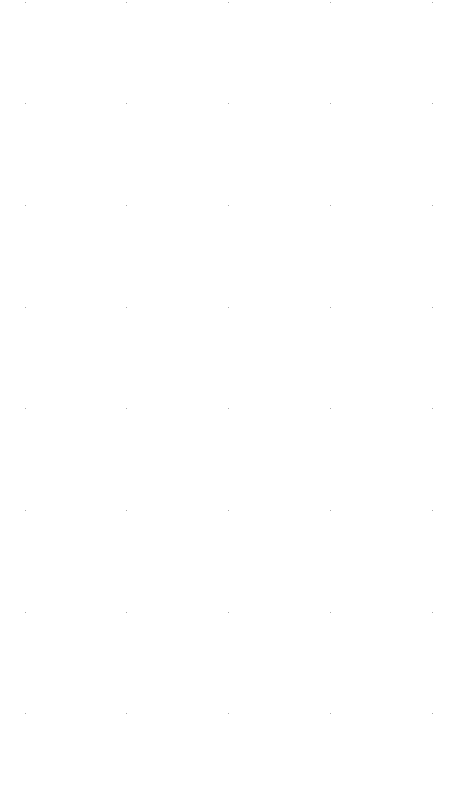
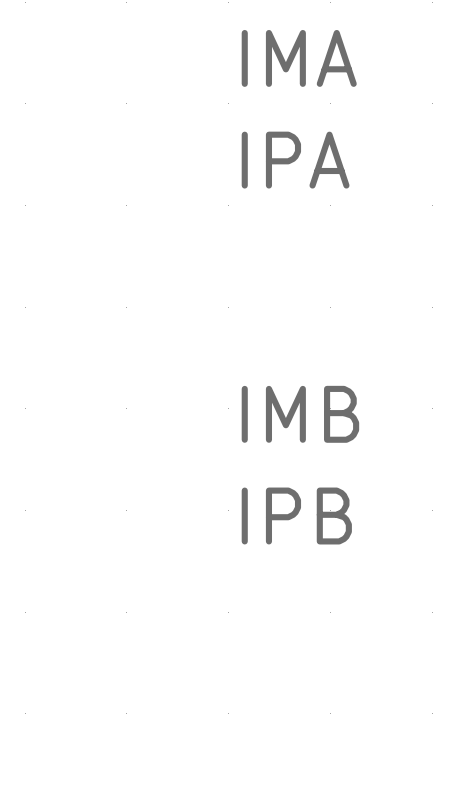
label: none -> IMA (299, 58)
label: none -> IPA (295, 160)
label: none -> IMB (300, 414)
label: none -> IPB (296, 516)

